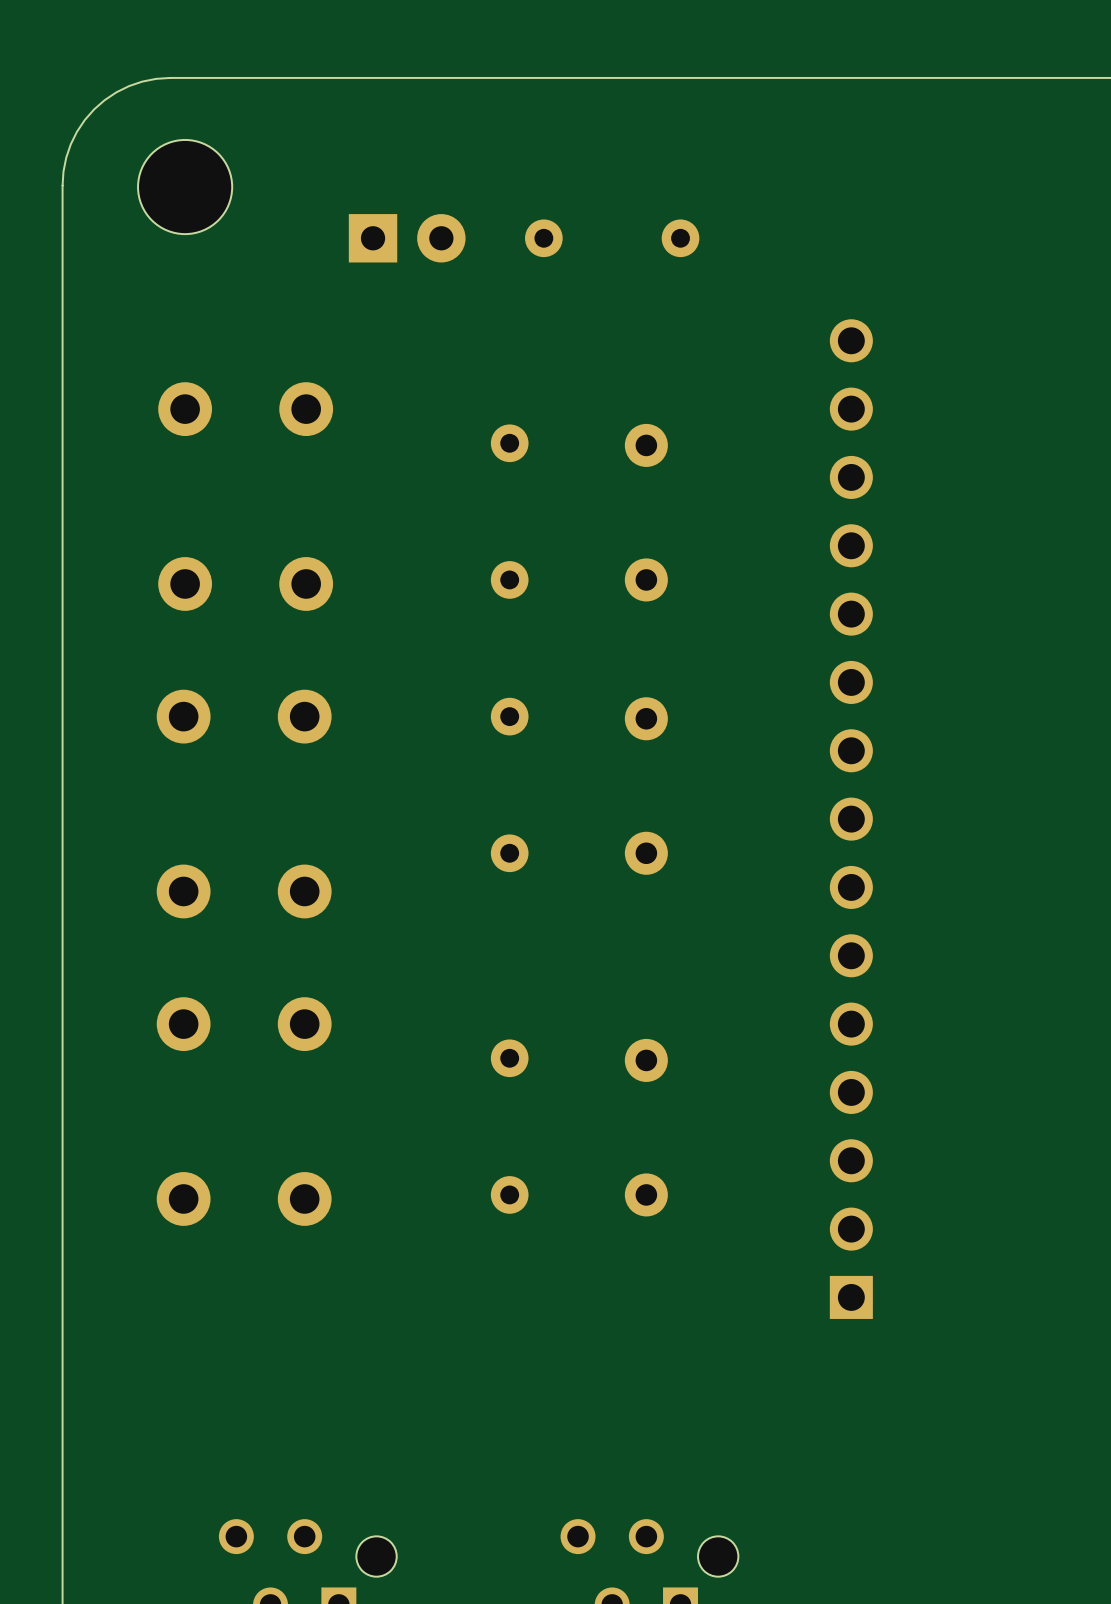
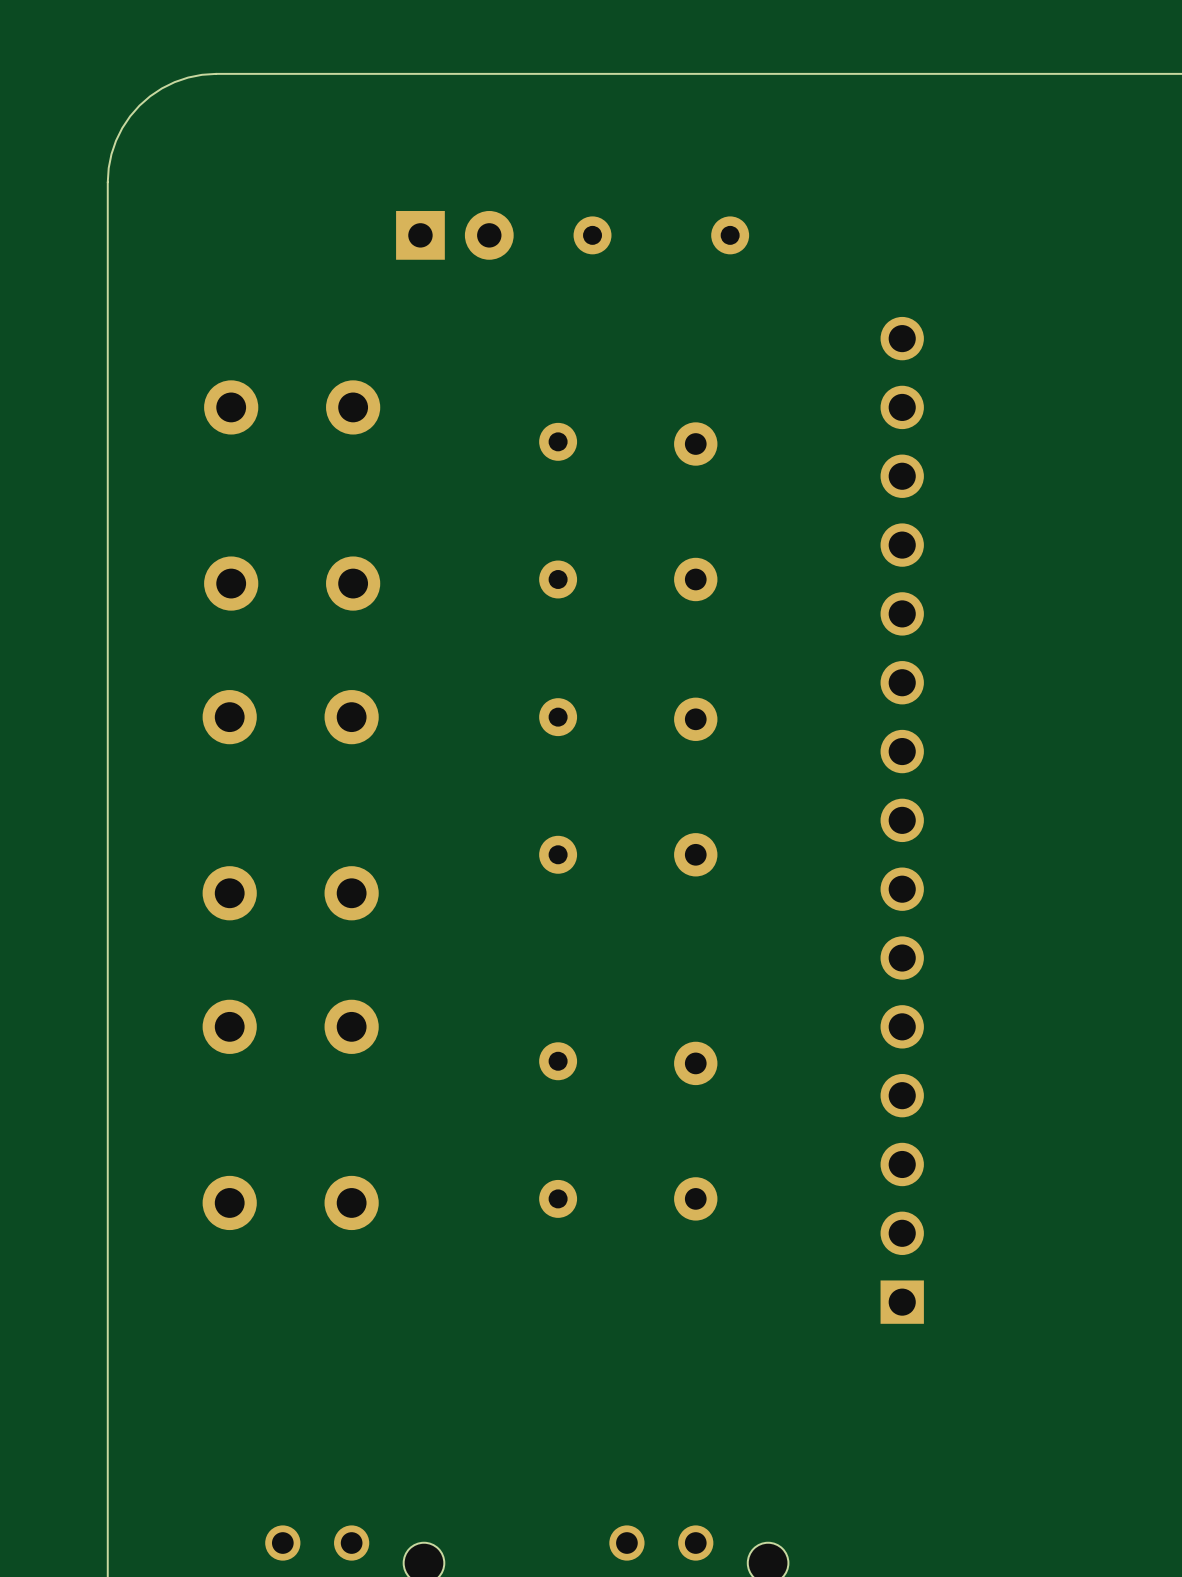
part: (185, 187) -> none

